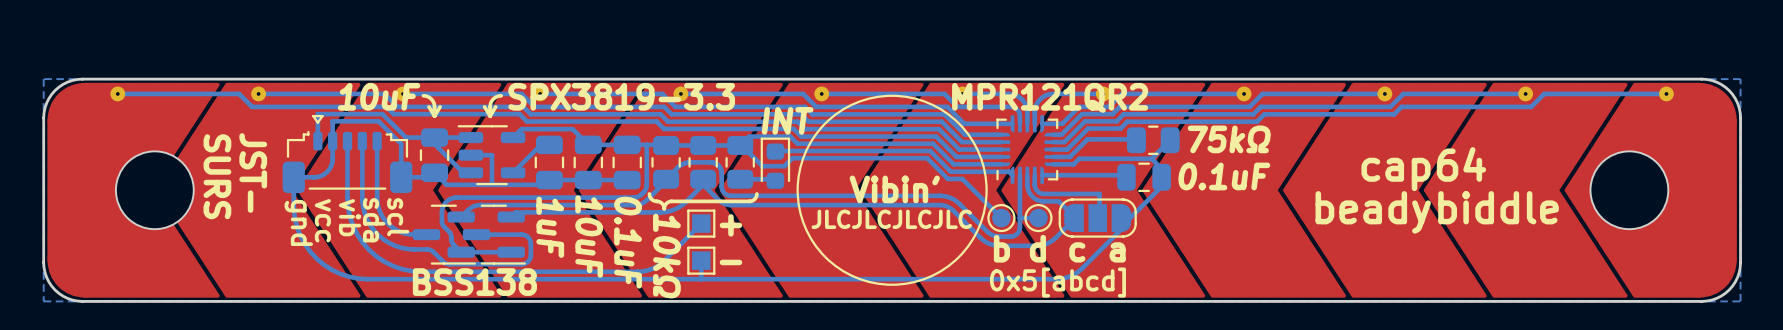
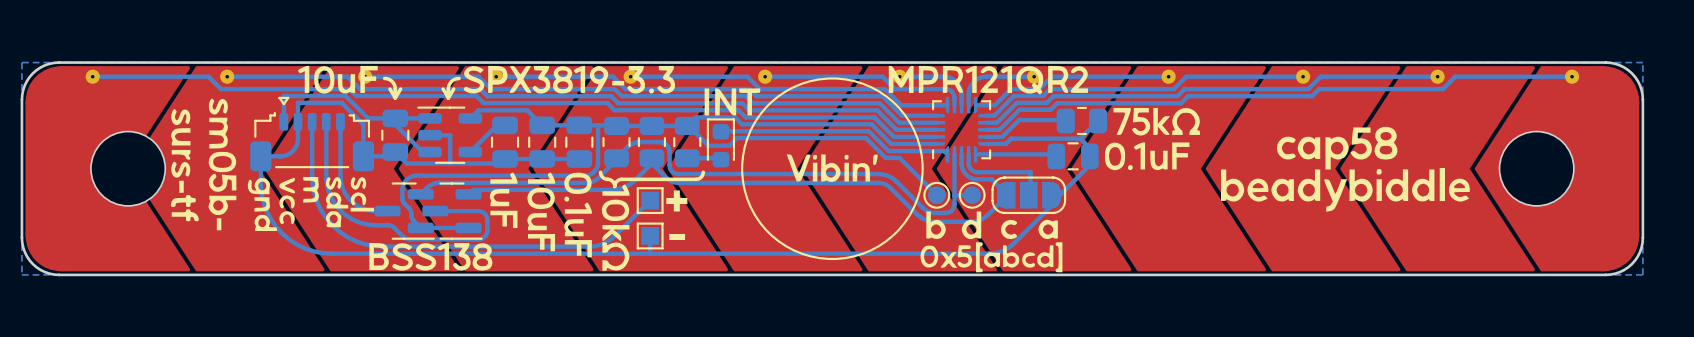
drawing: none -> [170, 65, 1470, 273]
part value: 10uF (379, 96) -> none
part value: SPX3819-3.3 (621, 96) -> none
part value: MPR121QR2 (1050, 97) -> none
part value: INT (787, 120) -> none
part value: 75kΩ (1229, 139) -> none
text: 64 (1461, 164) -> none
text: JST- (253, 173) -> none
text: cap (1395, 174) -> none
text: SURS (217, 176) -> none
part value: 0.1uF (1224, 176) -> none
text: Vibin' (894, 189) -> none
text: biddle (1498, 207) -> none
text: beady (1373, 212) -> none
text: vib (350, 217) -> none
text: scl (398, 217) -> none
text: JLCJLCJLCJLC (891, 219) -> none
text: vcc (322, 220) -> none
text: sda (374, 220) -> none
text: gnd (298, 222) -> none
part value: + (730, 225) -> none
part value: 1uF (550, 227) -> none
part value: 10uF (589, 236) -> none
part value: 0.1uF (628, 242) -> none
part value: b (1001, 248) -> none
part value: d (1037, 248) -> none
part text: c (1077, 252) -> none
part text: a (1117, 252) -> none
part value: 10kΩ (666, 256) -> none
part value: - (730, 262) -> none
part value: BSS138 (474, 282) -> none
text: 0x5[abcd] (1057, 282) -> none

